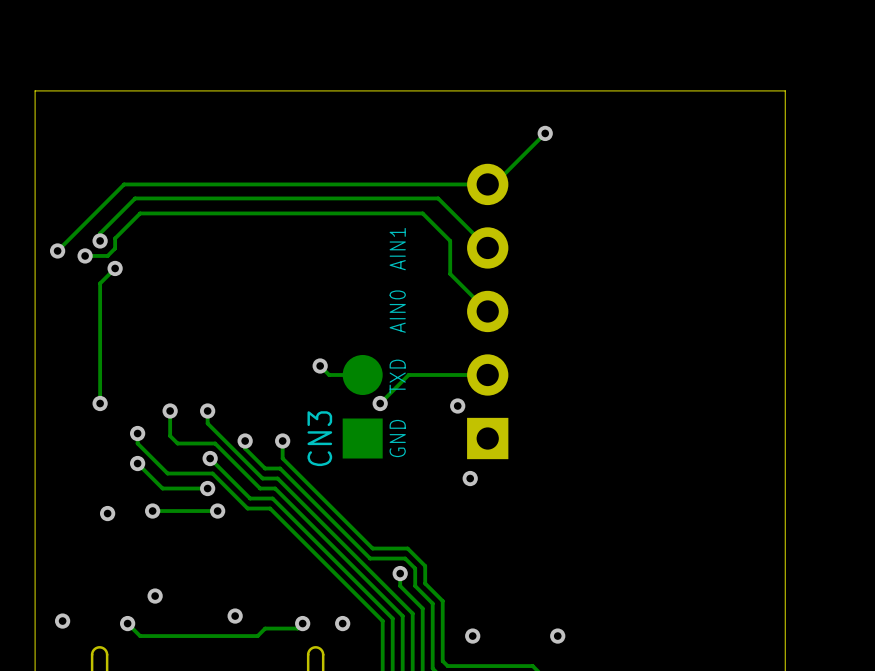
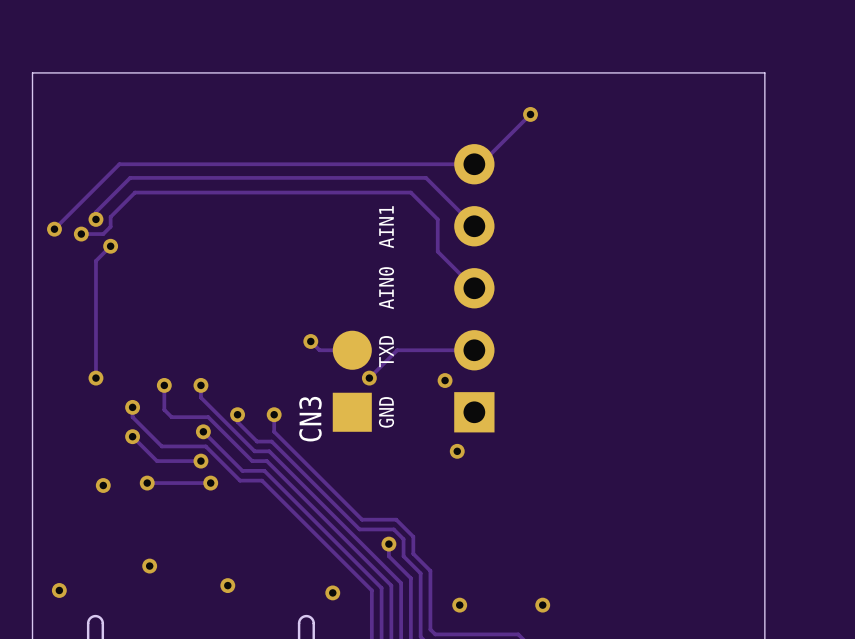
via: (127, 623) -> none
track: (302, 623) (297, 628) (265, 628) (257, 636) (140, 636) (127, 623) -> none
via: (302, 623) -> none

